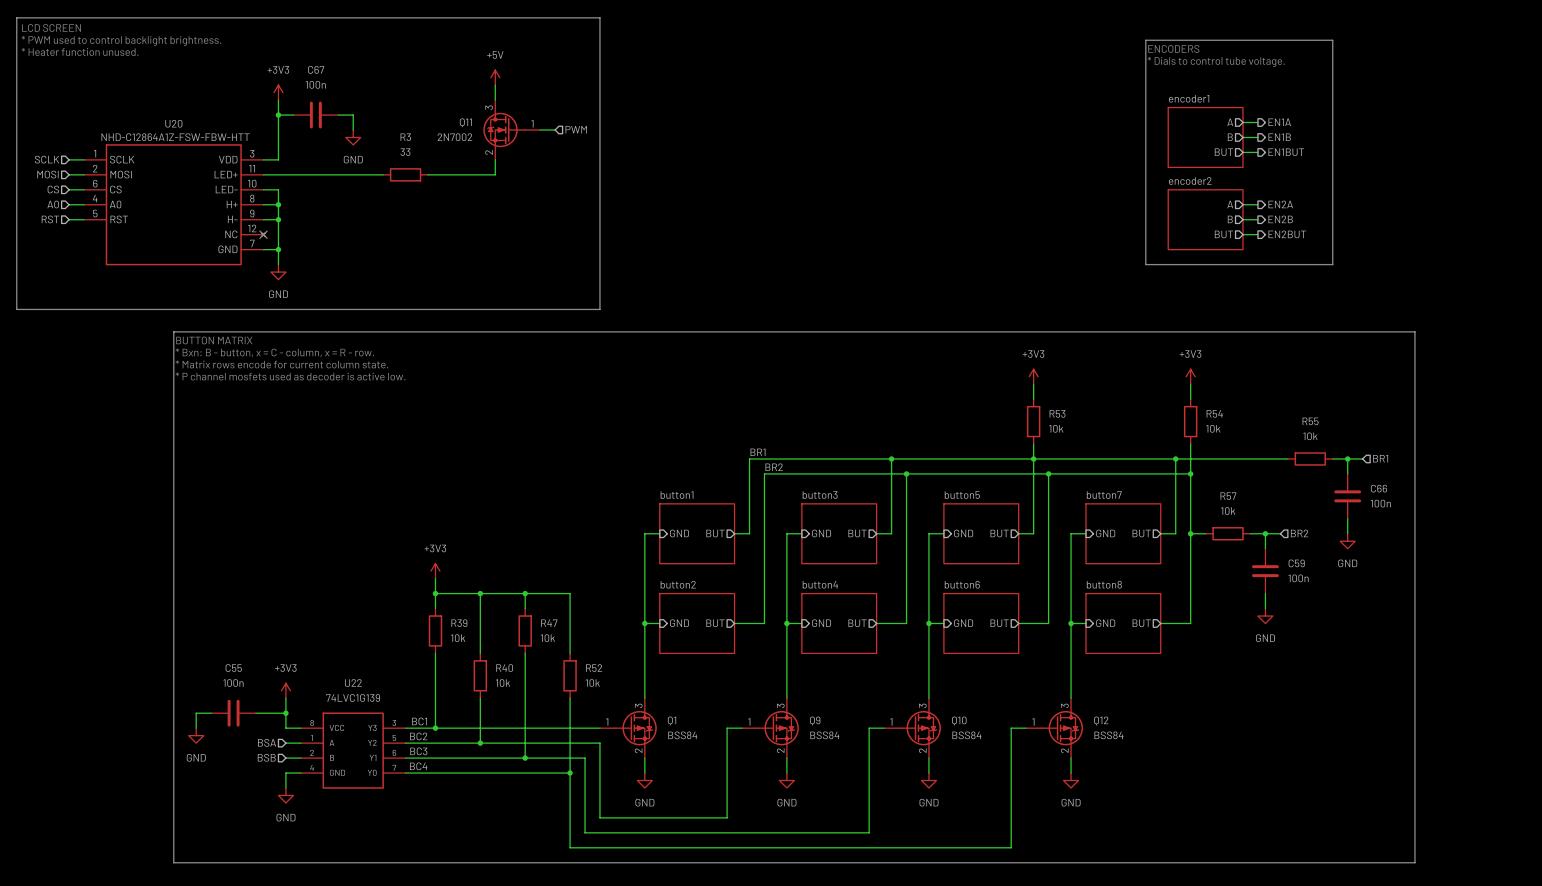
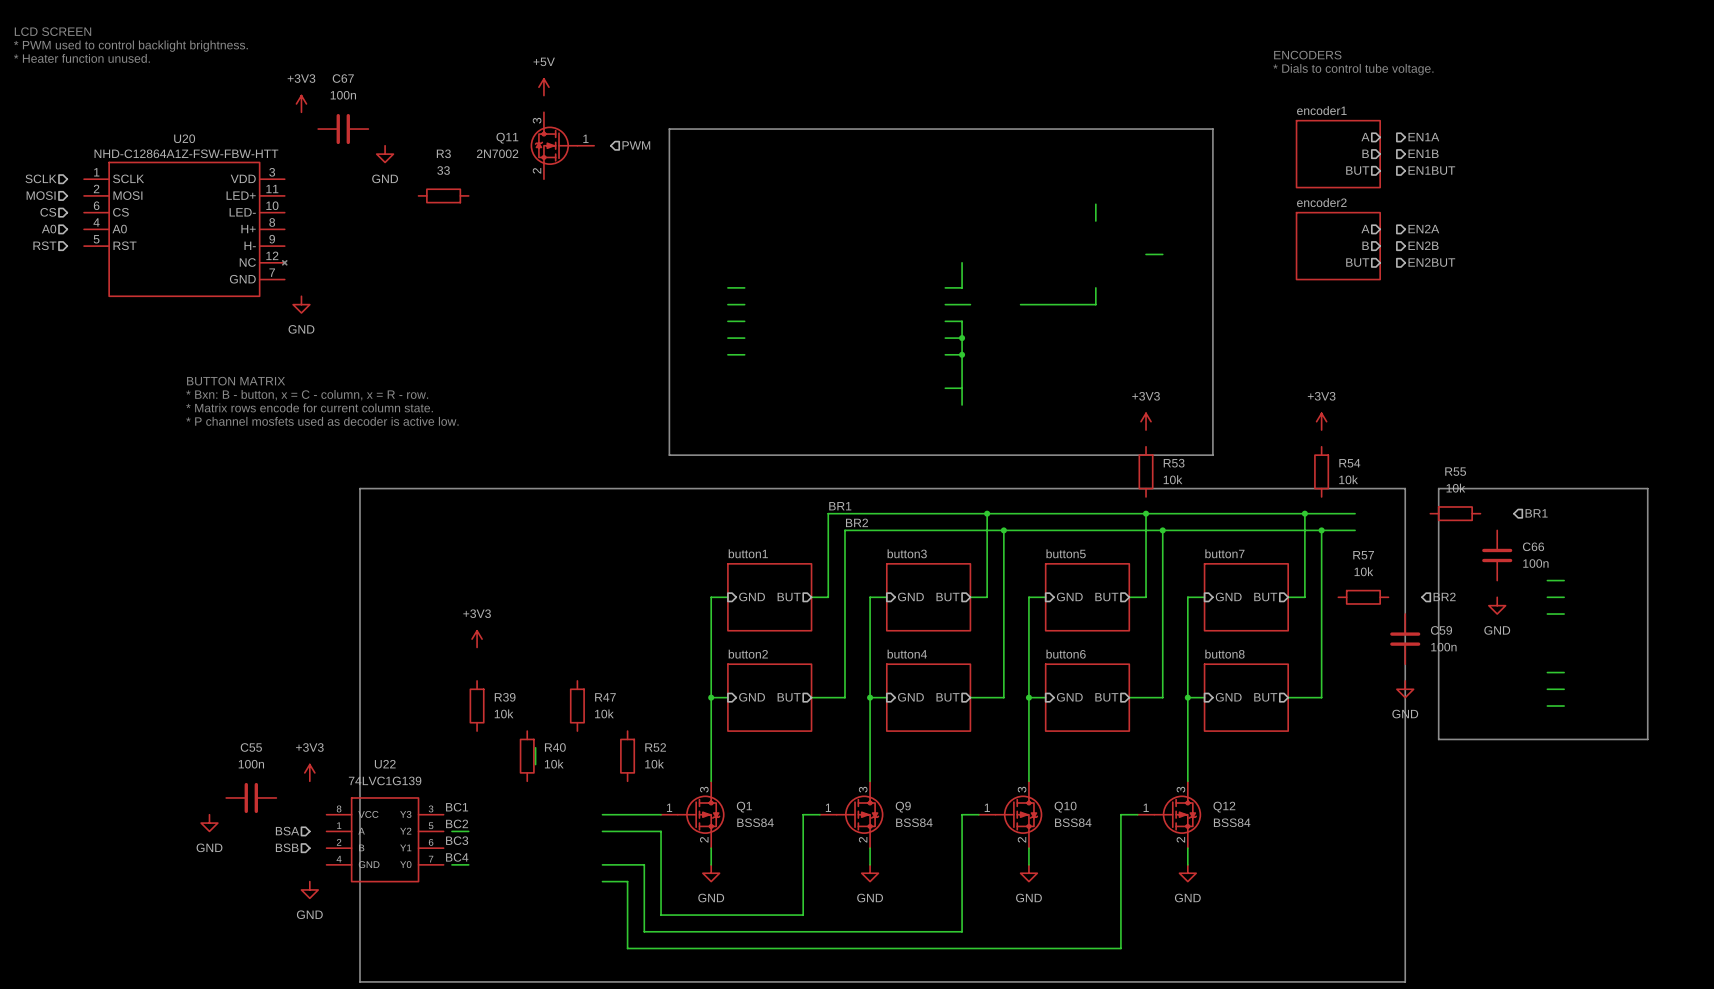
line: (16, 17) (599, 17) (599, 309) (16, 309) (16, 17) -> none
line: (1145, 40) (1332, 40) (1332, 264) (1145, 264) (1145, 40) -> none
wire: (495, 85) (495, 100) -> none
wire: (278, 100) (278, 159) (263, 159) -> none
wire: (278, 115) (293, 115) -> none
junction: (278, 115) -> none
wire: (338, 115) (353, 115) (353, 130) -> none
line: none -> (669, 129) (1212, 129) (1212, 455) (669, 455) (669, 129)
wire: (1243, 122) (1257, 122) -> none
wire: (540, 130) (555, 130) -> none
wire: (1243, 137) (1257, 137) -> none
wire: (1243, 152) (1257, 152) -> none
wire: (69, 159) (84, 159) -> none
wire: (495, 159) (495, 174) (428, 174) -> none
wire: (69, 174) (84, 174) -> none
wire: (263, 174) (383, 174) -> none
wire: none -> (1095, 204) (1095, 221)
wire: (69, 189) (84, 189) -> none
wire: (263, 189) (278, 189) (278, 264) -> none
wire: (69, 204) (84, 204) -> none
wire: (263, 204) (278, 204) -> none
junction: (278, 204) -> none
wire: (1243, 204) (1257, 204) -> none
wire: (69, 219) (84, 219) -> none
wire: (263, 219) (278, 219) -> none
junction: (278, 219) -> none
wire: (1243, 219) (1257, 219) -> none
wire: none -> (1146, 254) (1162, 254)
no-connect mark: (263, 234) -> none
wire: none -> (962, 262) (962, 287) (945, 287)
wire: (1243, 234) (1257, 234) -> none
wire: (263, 249) (278, 249) -> none
junction: (278, 249) -> none
wire: none -> (727, 287) (744, 287)
wire: none -> (1095, 287) (1095, 304) (1020, 304)
wire: none -> (727, 304) (744, 304)
wire: none -> (945, 304) (970, 304)
wire: none -> (727, 321) (744, 321)
wire: none -> (945, 321) (962, 321) (962, 404)
wire: none -> (727, 338) (744, 338)
wire: none -> (945, 338) (962, 338)
junction: none -> (962, 338)
wire: none -> (727, 354) (744, 354)
wire: none -> (945, 354) (962, 354)
junction: none -> (962, 354)
line: (173, 331) (1414, 331) (1414, 862) (173, 862) (173, 331) -> (359, 488) (359, 981) (1405, 981) (1405, 488) (359, 488)
wire: none -> (945, 388) (962, 388)
wire: (1033, 384) (1033, 399) -> none
wire: (1190, 384) (1190, 399) -> none
line: none -> (1438, 488) (1647, 488) (1647, 739) (1438, 739) (1438, 488)
wire: (1033, 444) (1033, 458) -> none
wire: (1190, 444) (1190, 473) -> (1355, 530) (1321, 530)
wire: (1220, 458) (1287, 458) -> none
wire: (1332, 458) (1362, 458) -> none
wire: (1347, 458) (1347, 473) -> none
junction: (1347, 458) -> none
wire: (1347, 518) (1347, 533) -> none
wire: none -> (1547, 580) (1564, 580)
wire: (1190, 533) (1205, 533) -> none
junction: (1190, 533) -> none
wire: (1250, 533) (1280, 533) -> none
junction: (1265, 533) -> none
wire: none -> (1547, 597) (1564, 597)
wire: none -> (1547, 614) (1564, 614)
wire: (435, 578) (435, 608) -> none
wire: (435, 593) (570, 593) (570, 653) -> none
junction: (435, 593) -> none
wire: (480, 593) (480, 653) -> none
junction: (480, 593) -> none
wire: (525, 593) (525, 608) -> (535, 747) (535, 764)
junction: (525, 593) -> none
wire: none -> (1547, 672) (1564, 672)
wire: none -> (1547, 689) (1564, 689)
wire: none -> (1547, 706) (1564, 706)
wire: (435, 653) (435, 728) -> none
wire: (525, 653) (525, 758) -> none
wire: (285, 698) (285, 728) (300, 728) -> none
wire: (480, 698) (480, 743) -> none
wire: (570, 698) (570, 787) -> (602, 881) (627, 881)
wire: (211, 713) (196, 713) (196, 728) -> none
wire: (256, 713) (285, 713) -> none
junction: (285, 713) -> none
wire: (405, 728) (547, 728) -> none
junction: (435, 728) -> none
wire: (285, 743) (300, 743) -> none
wire: (405, 743) (413, 743) -> none
wire: (428, 743) (547, 743) -> none
junction: (480, 743) -> none
wire: (285, 758) (300, 758) -> none
wire: (405, 758) (585, 758) (585, 773) -> (627, 864) (644, 864)
junction: (525, 758) -> none
wire: (300, 773) (285, 773) (285, 787) -> none
wire: (405, 773) (413, 773) -> none
wire: (428, 773) (547, 773) -> none
junction: (570, 773) -> none

